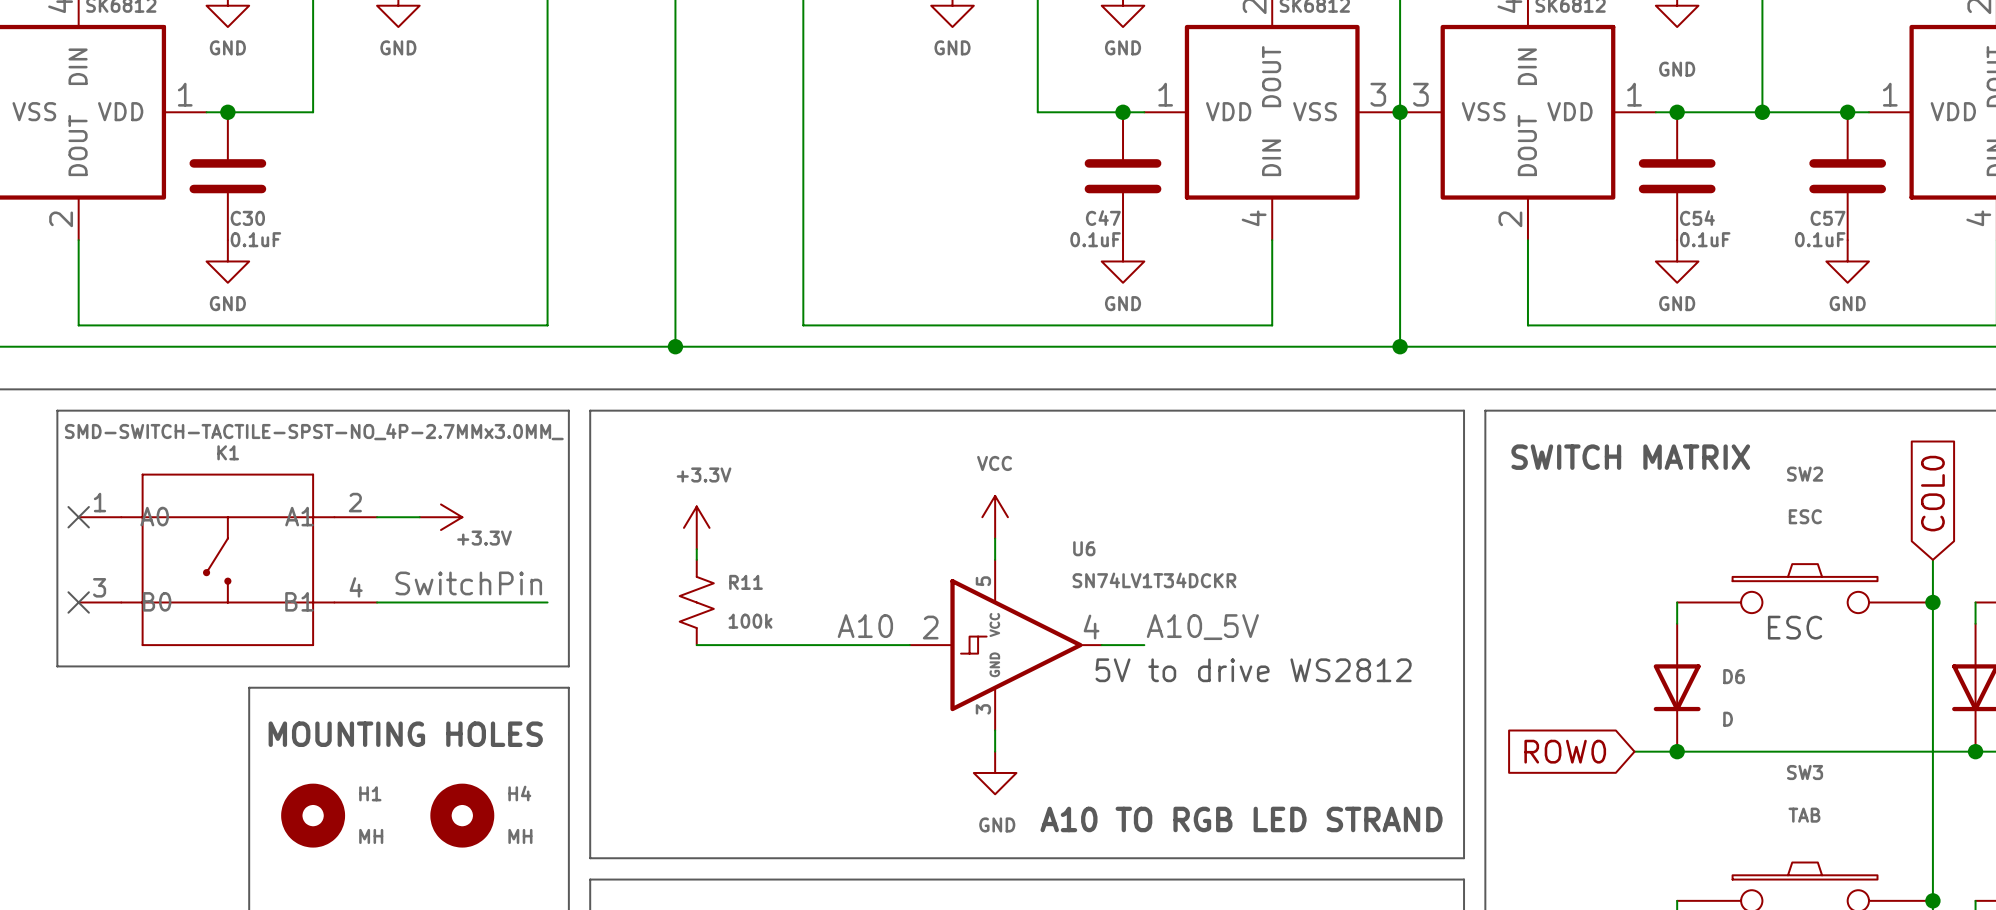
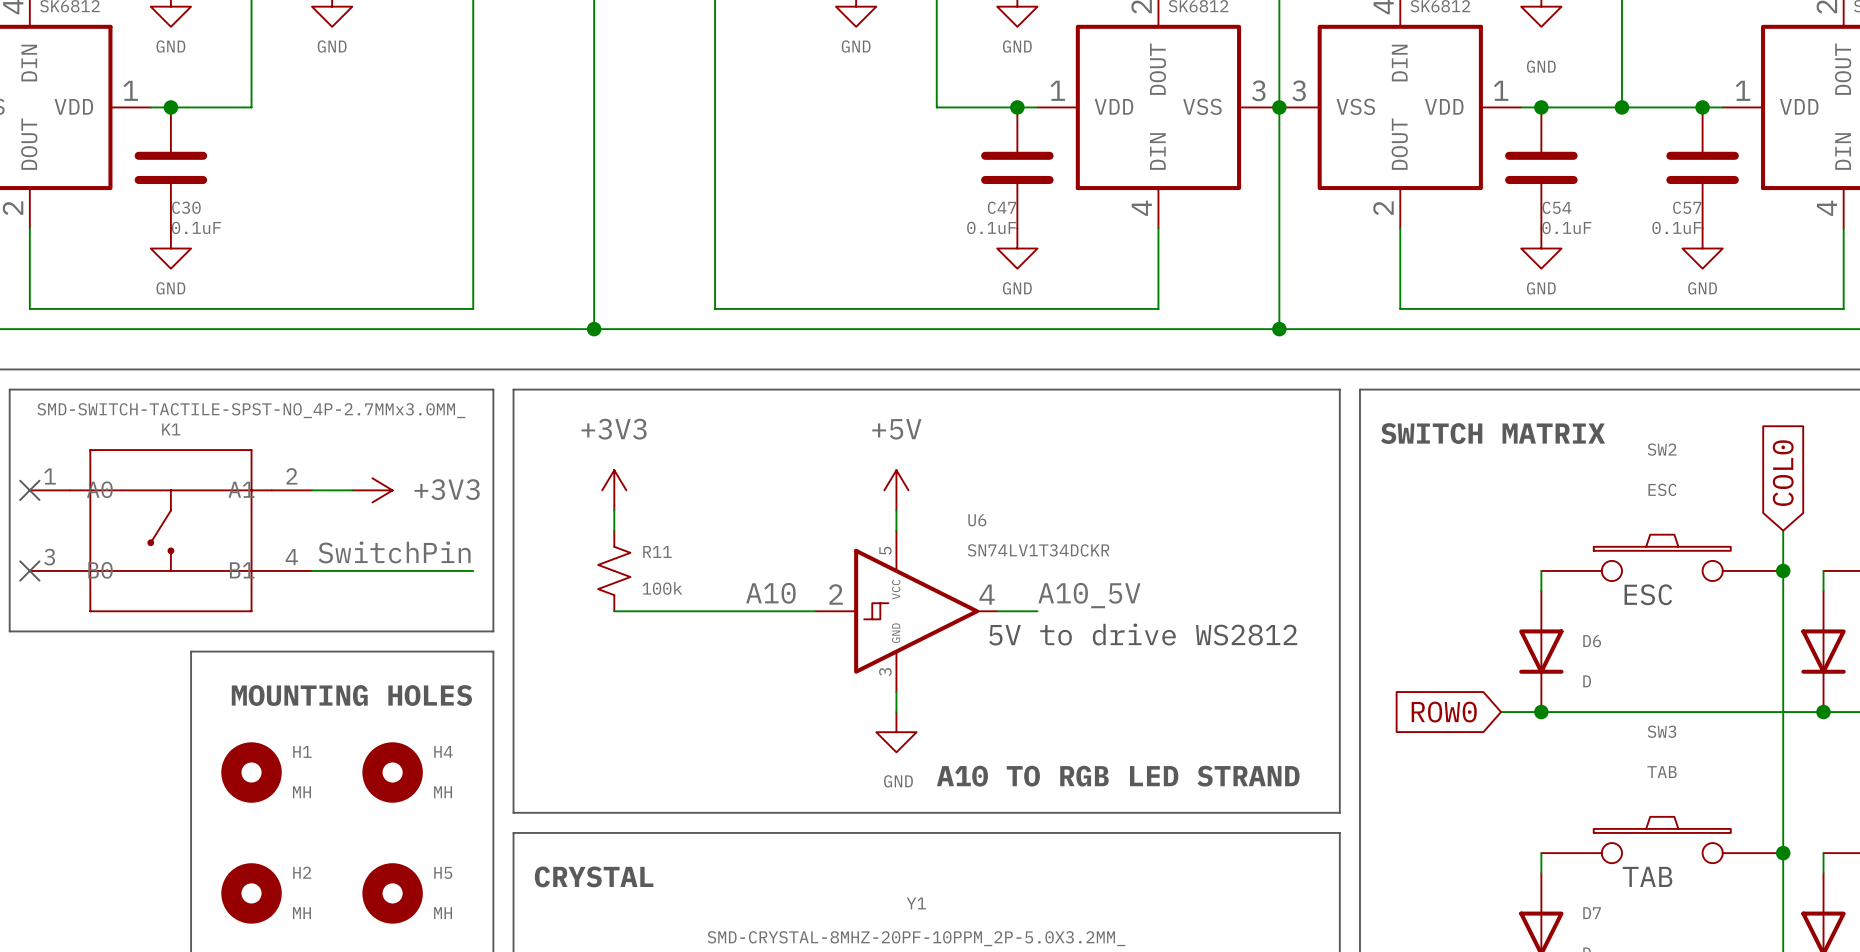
power symbol: +3.3V (441, 517) -> +3V3 (372, 490)
power symbol: VCC (995, 517) -> +5V (896, 490)
power symbol: +3.3V (696, 527) -> +3V3 (614, 490)

